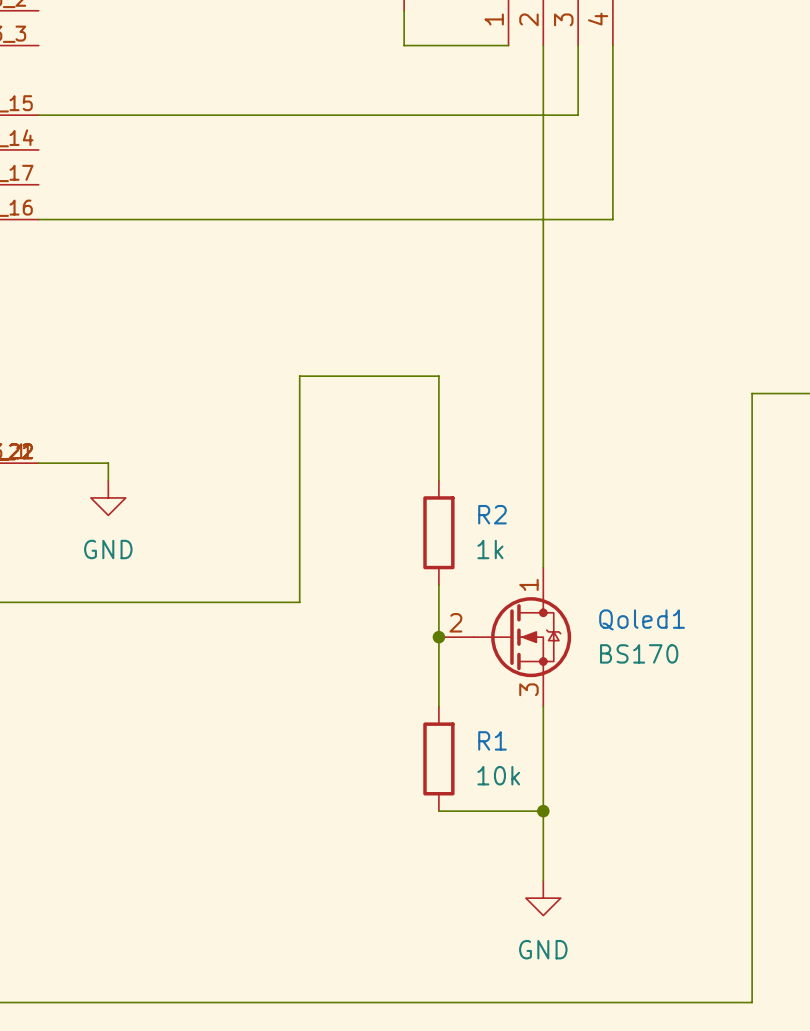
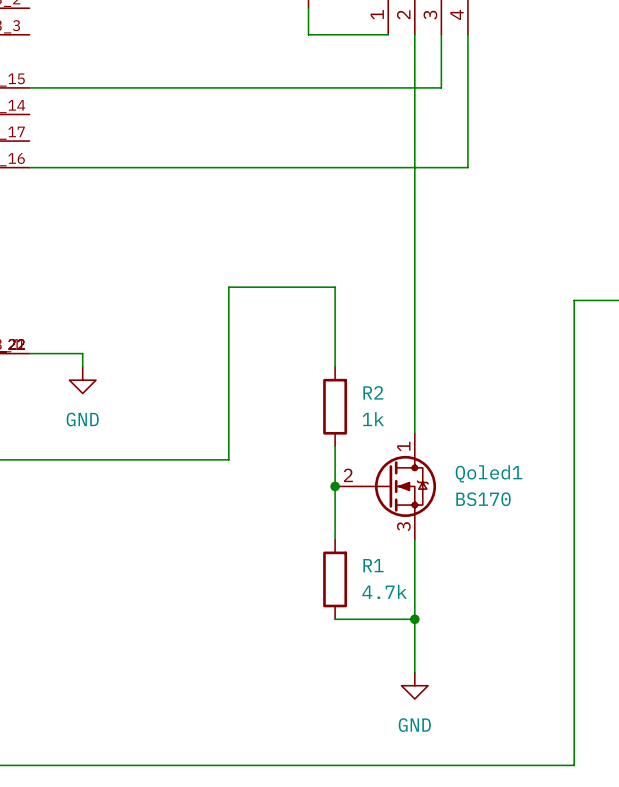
R1 value: 10k (498, 775) -> 4.7k (384, 591)

